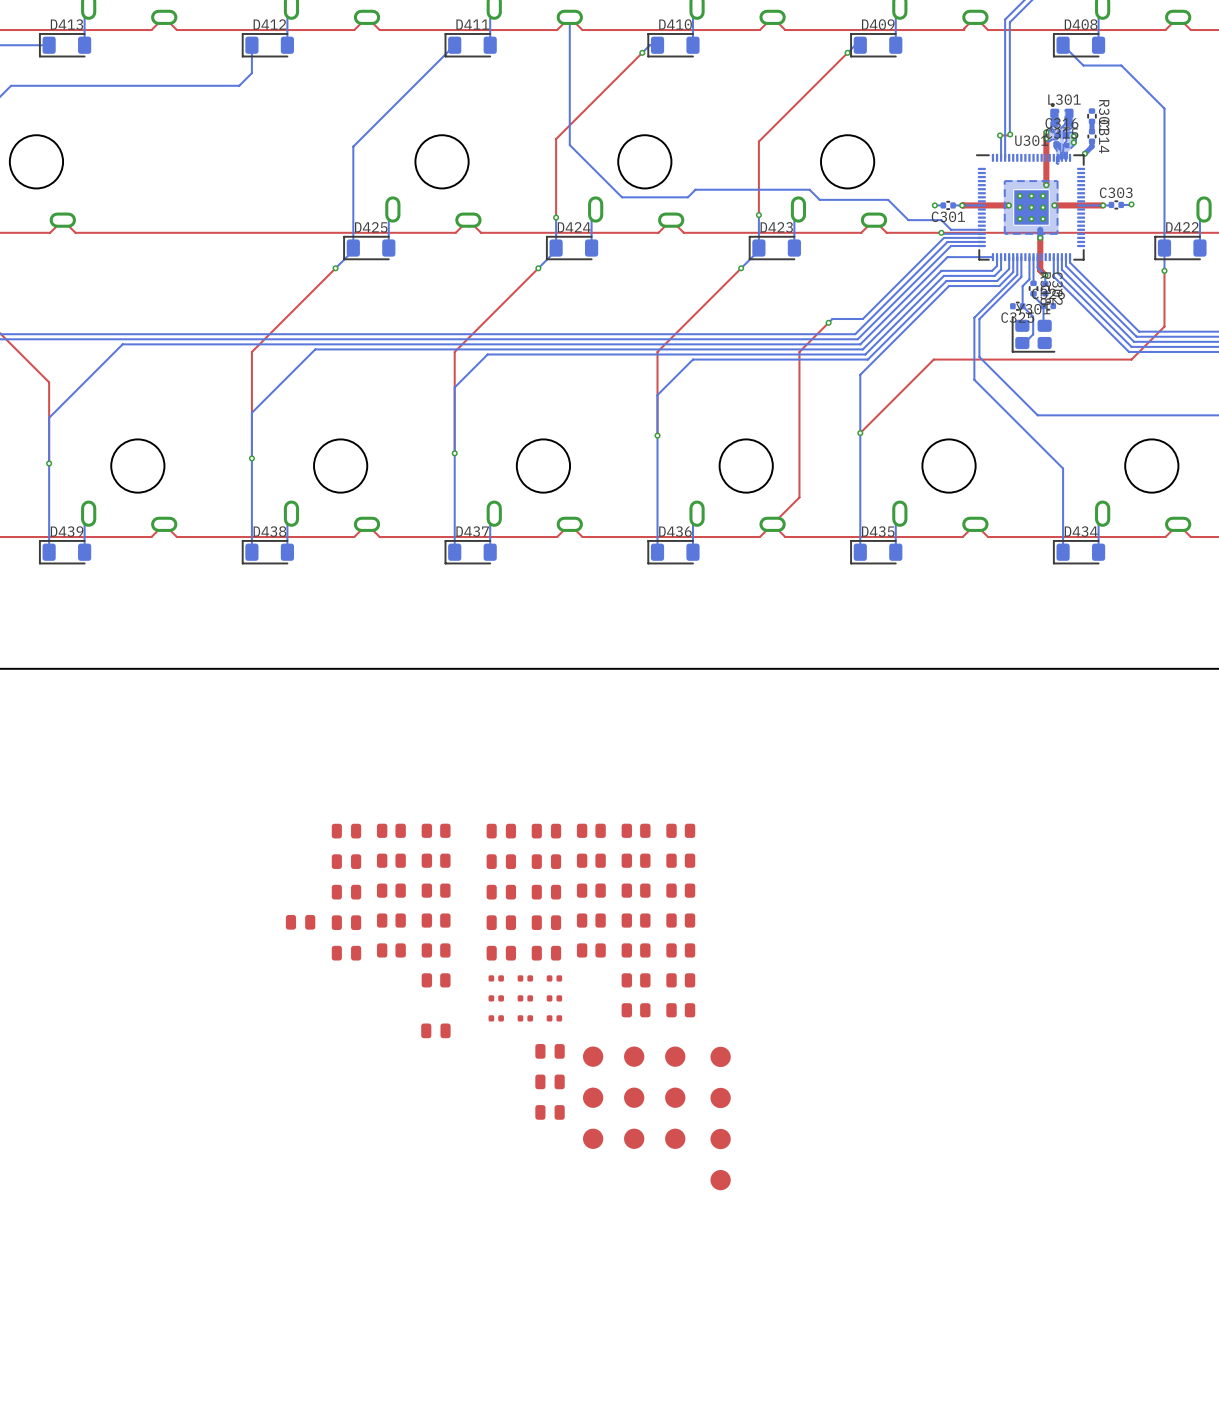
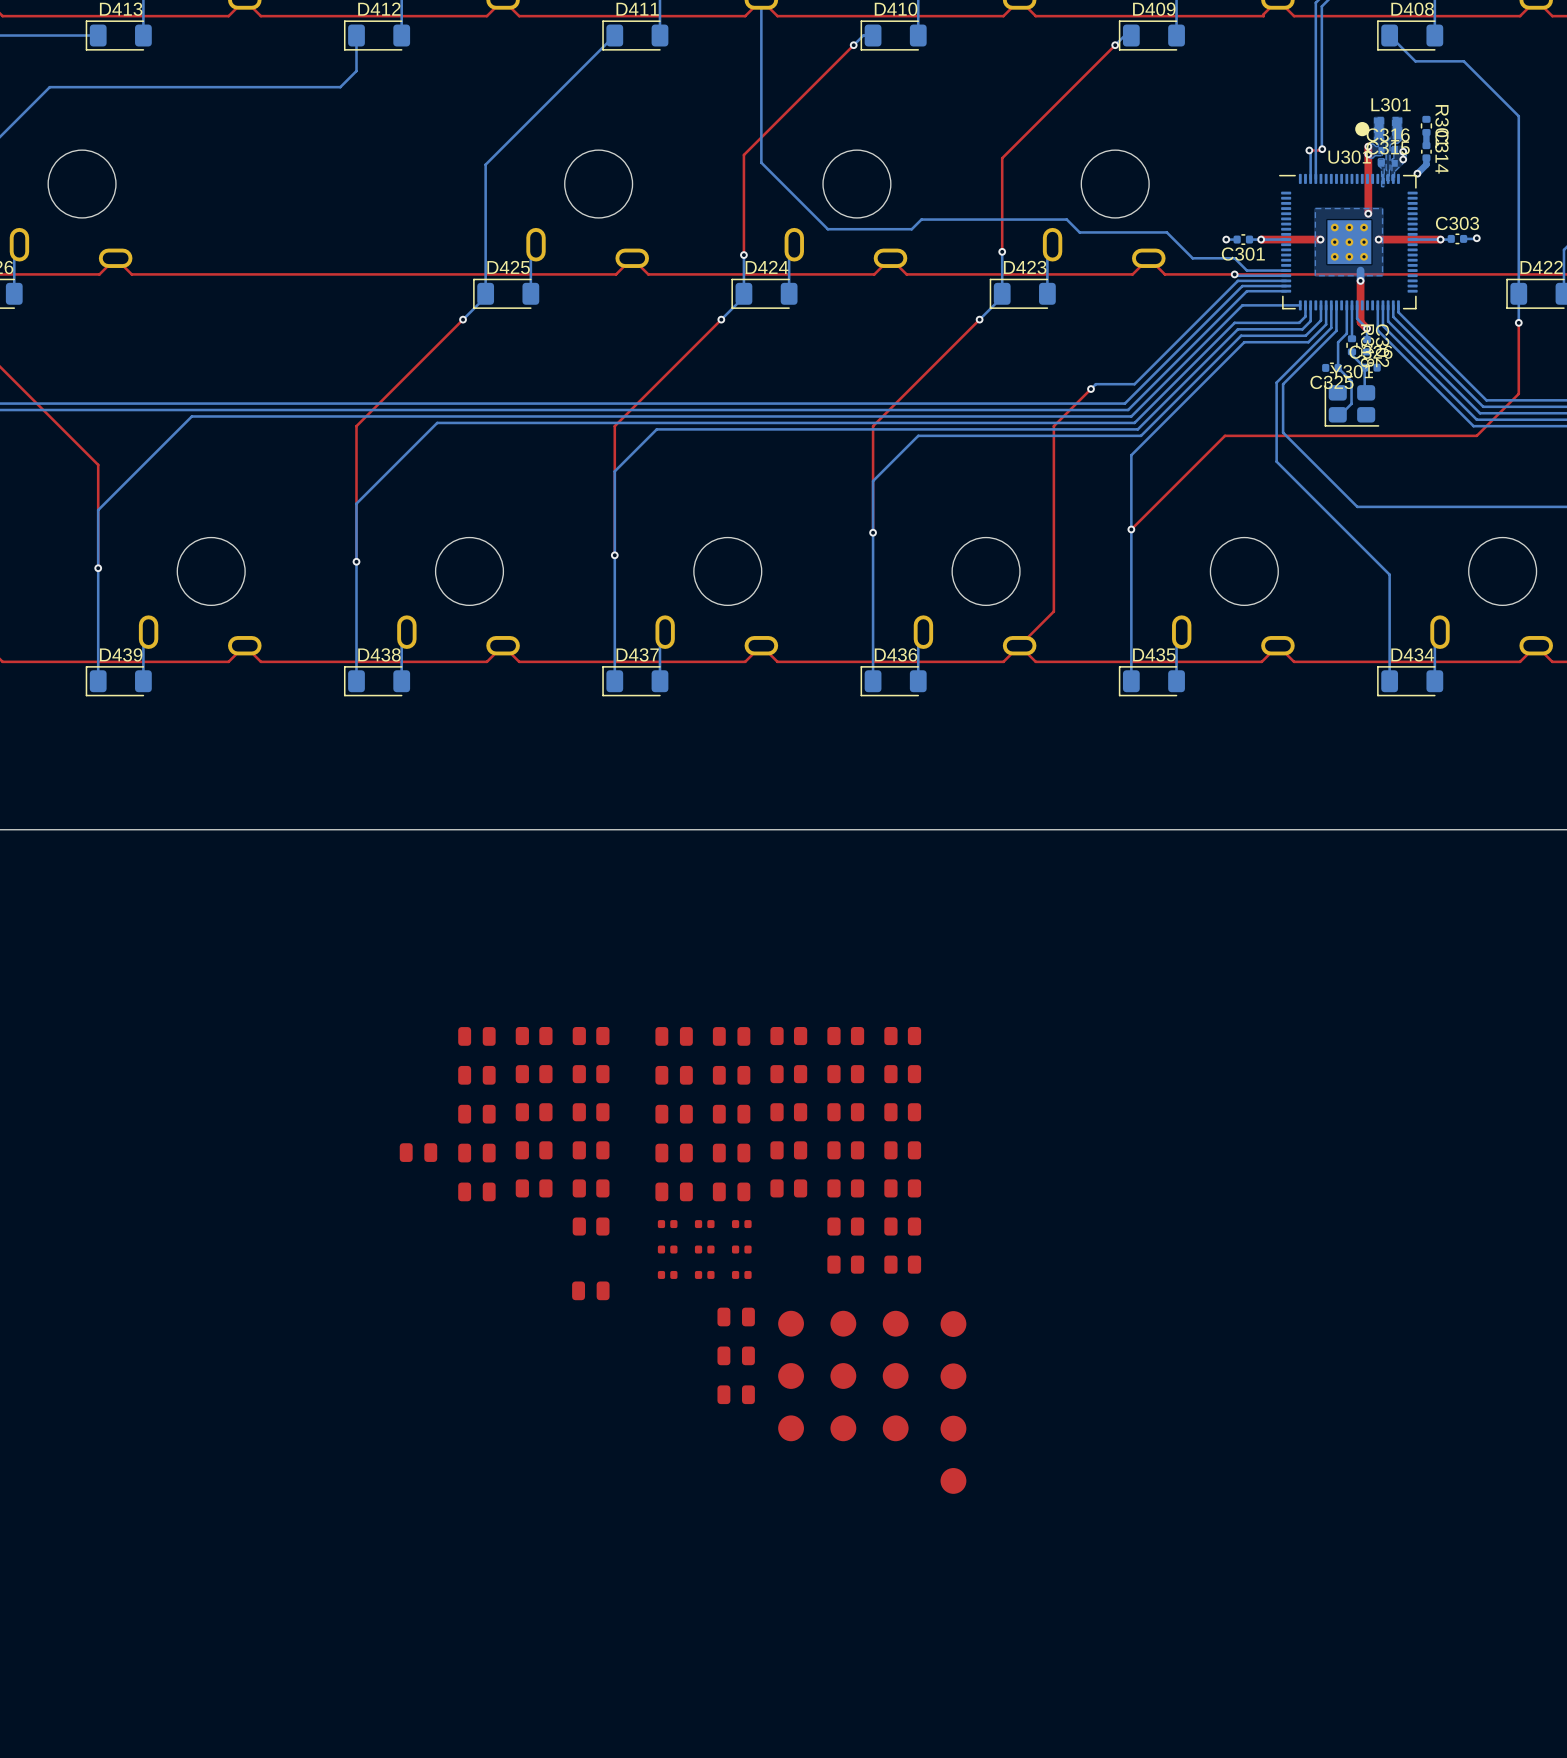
L301 footprint: [1050, 103, 1073, 127] -> [1355, 117, 1402, 140]

